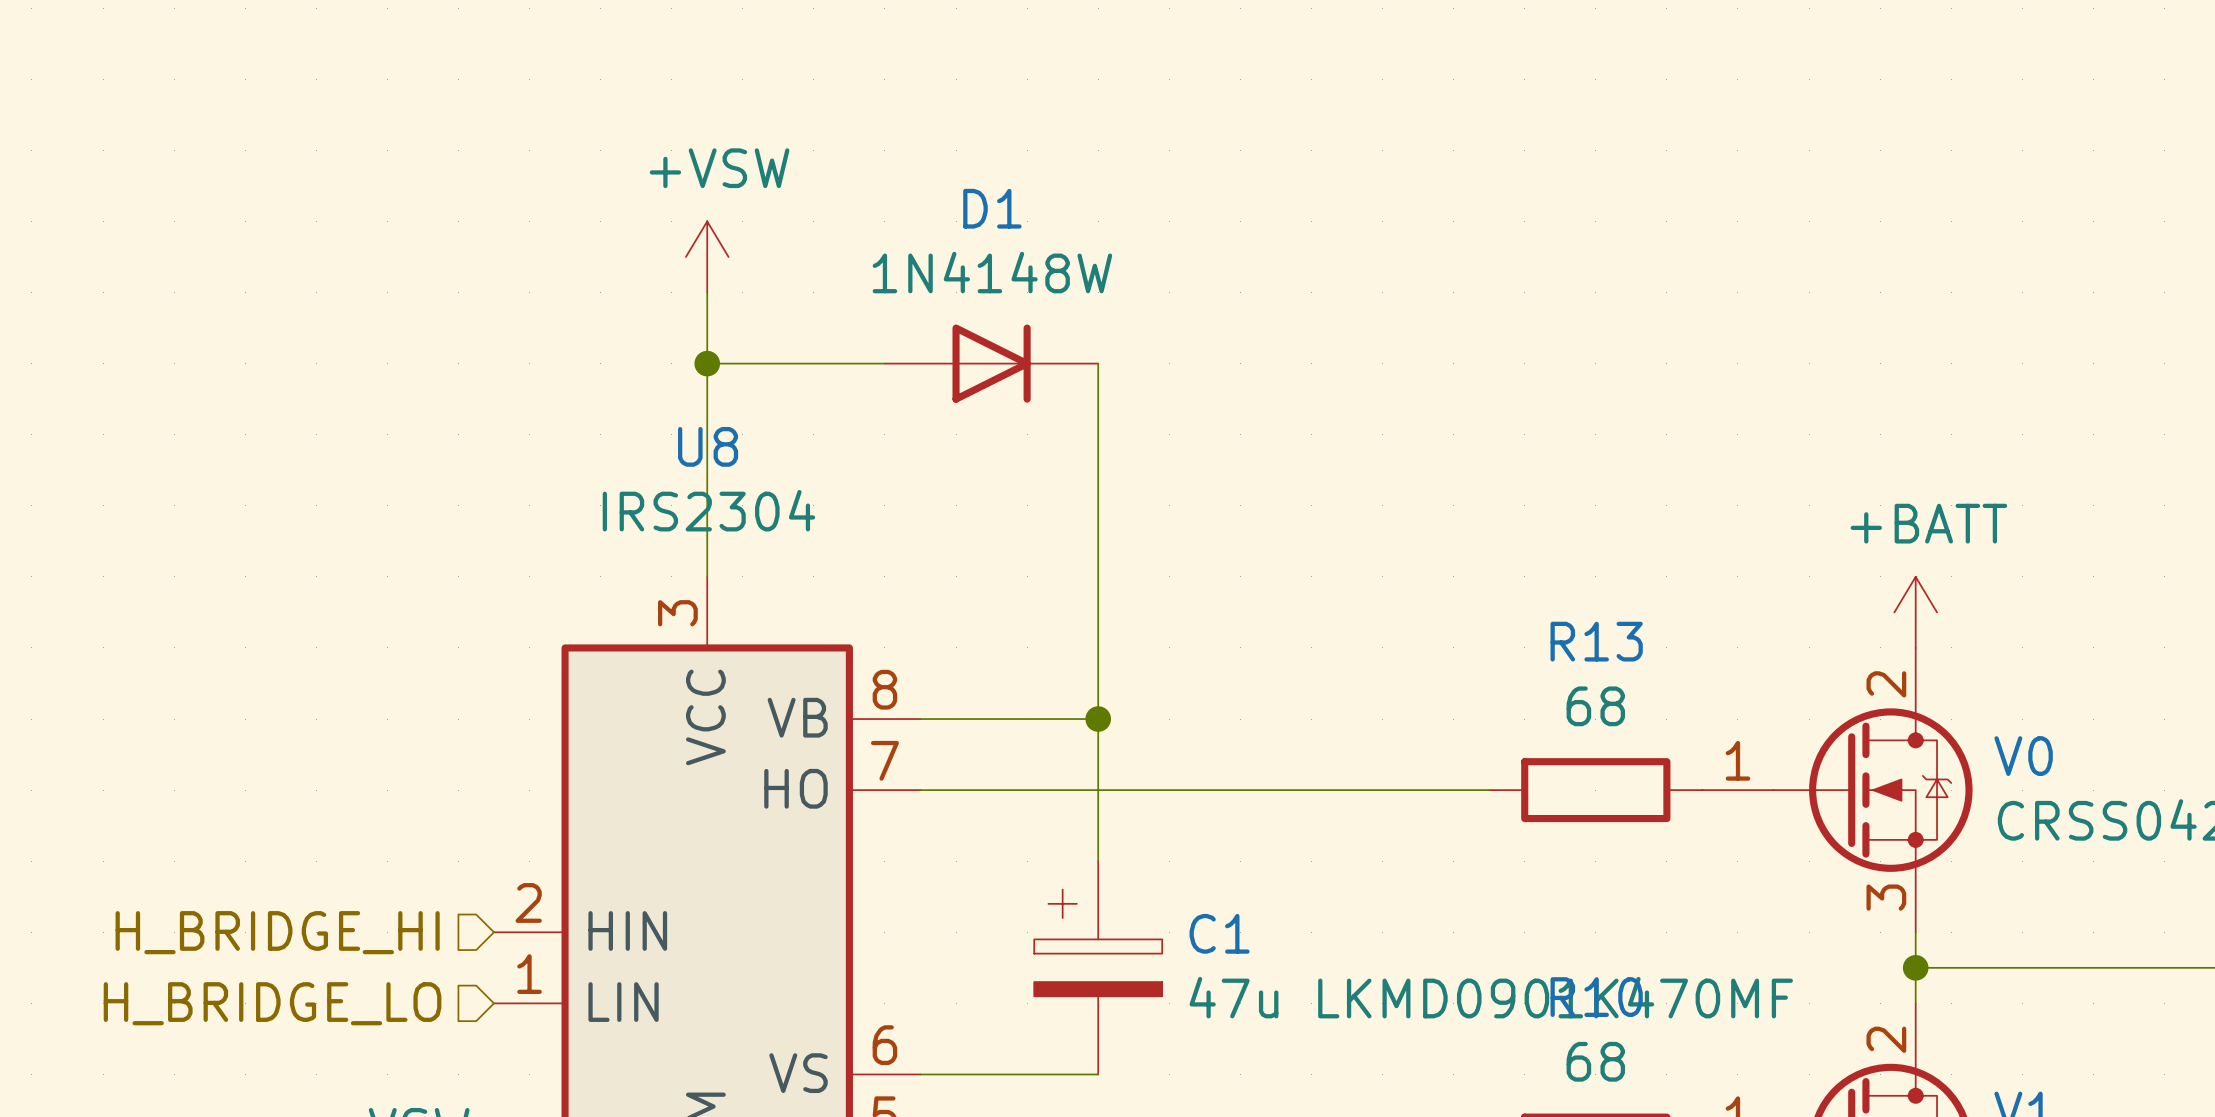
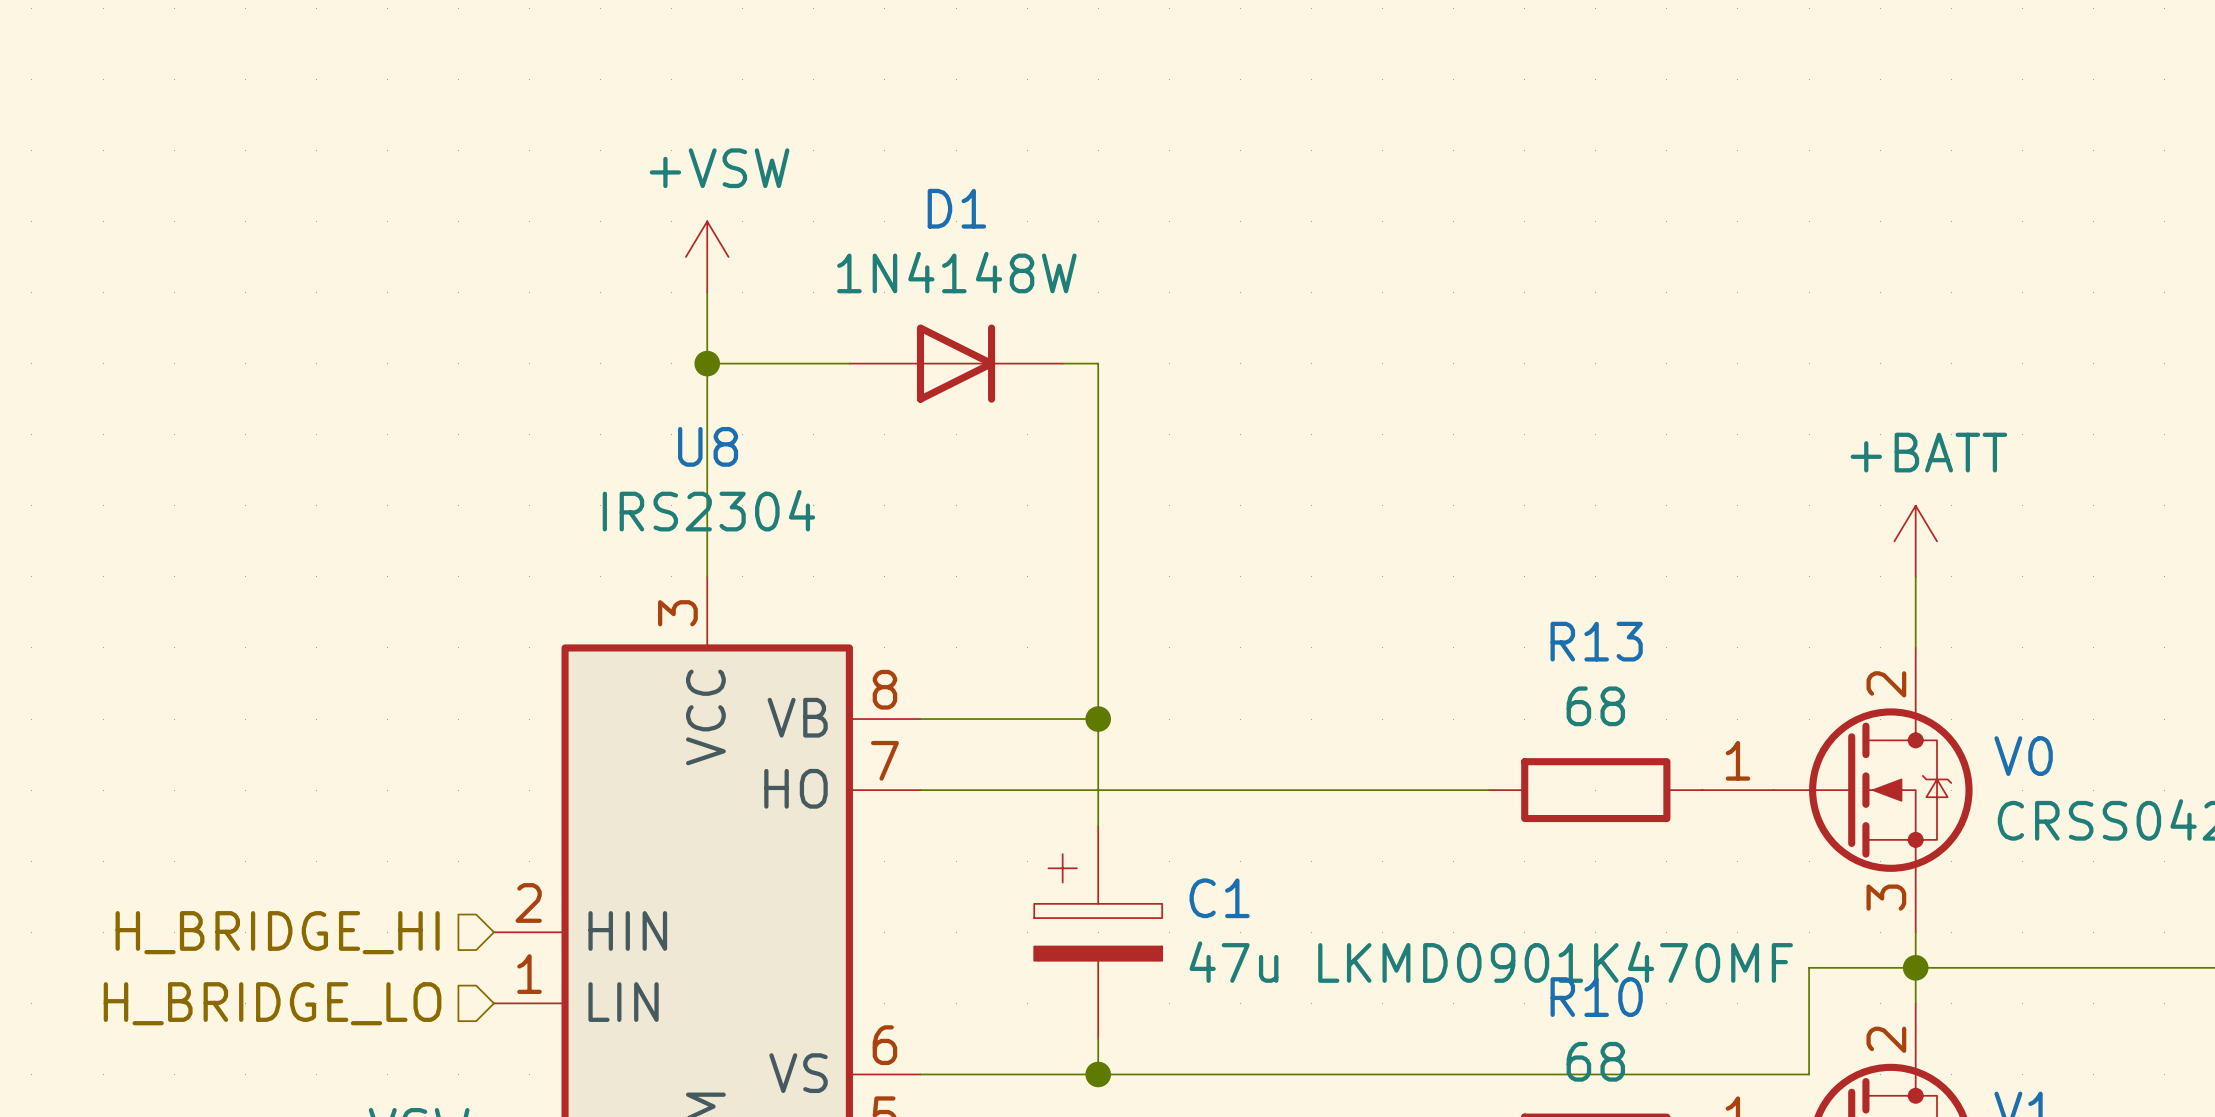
D1 position: (991, 363) -> (956, 363)
power symbol position: +BATT (1915, 612) -> +BATT (1915, 541)
C1 position: (1098, 967) -> (1098, 932)
wire: none -> (1915, 967) (1809, 967) (1809, 1074) (1098, 1074) (1098, 1038)
junction: none -> (1098, 1074)

